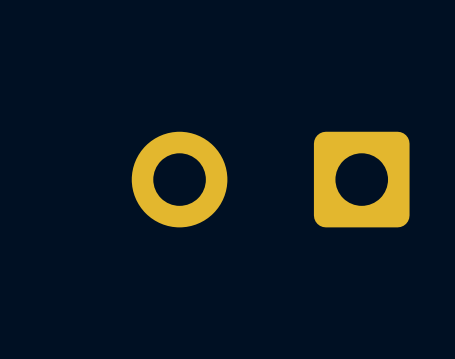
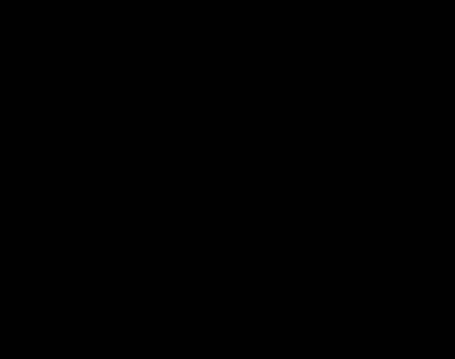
part: (270, 179) -> none

